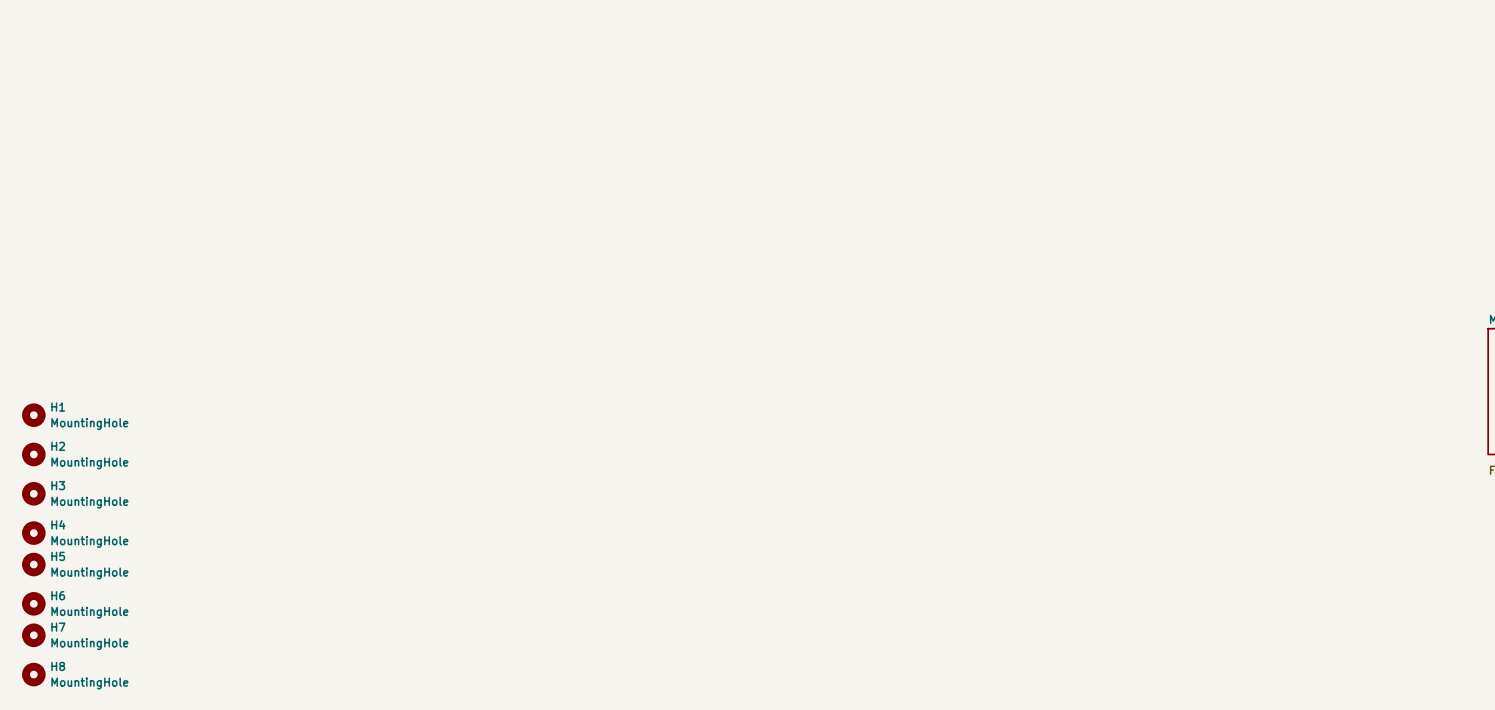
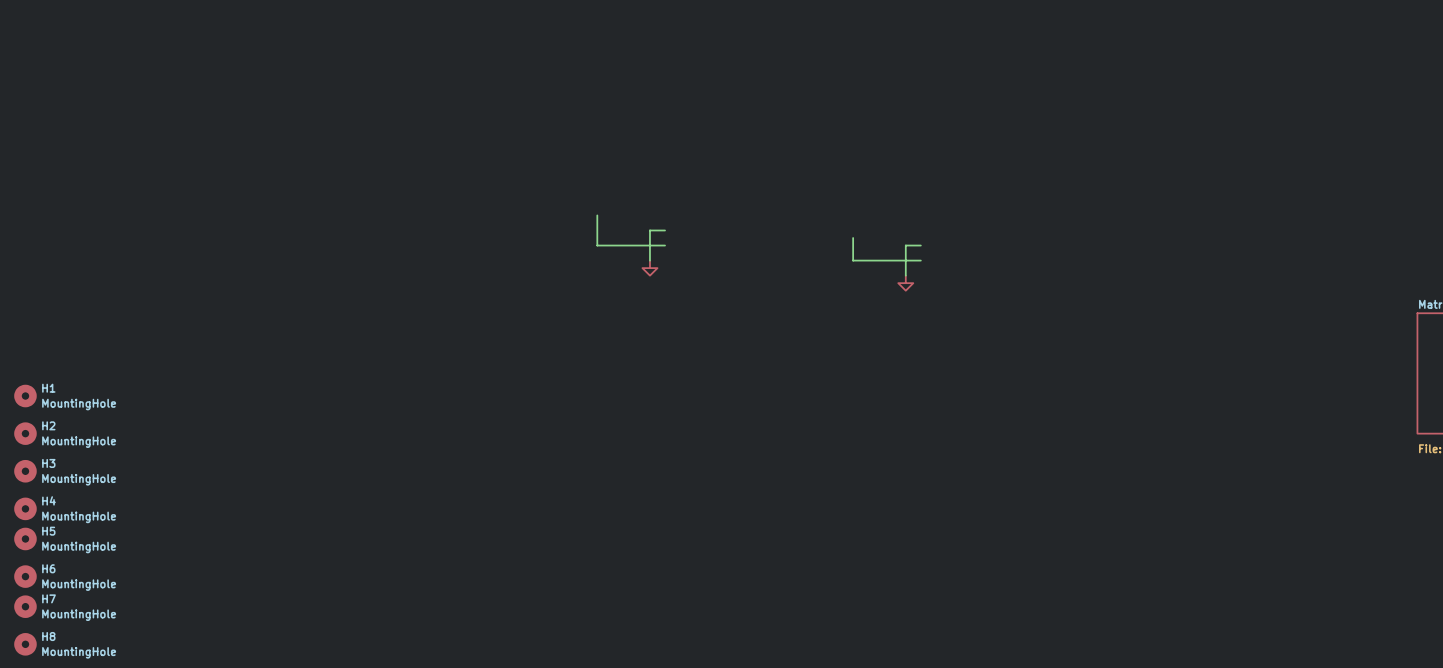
wire: none -> (597, 215) (597, 245) (665, 245)
wire: none -> (665, 230) (649, 230) (649, 260)
wire: none -> (853, 238) (853, 260) (920, 260)
wire: none -> (920, 245) (905, 245) (905, 275)
power symbol: none -> (649, 268)
power symbol: none -> (905, 283)

